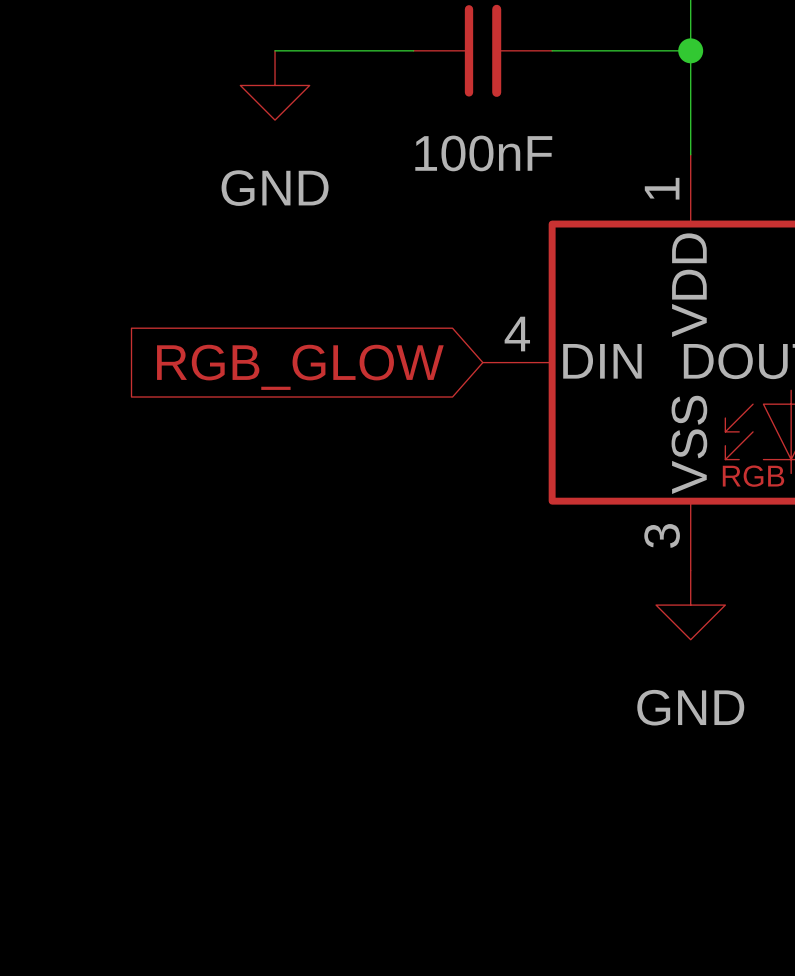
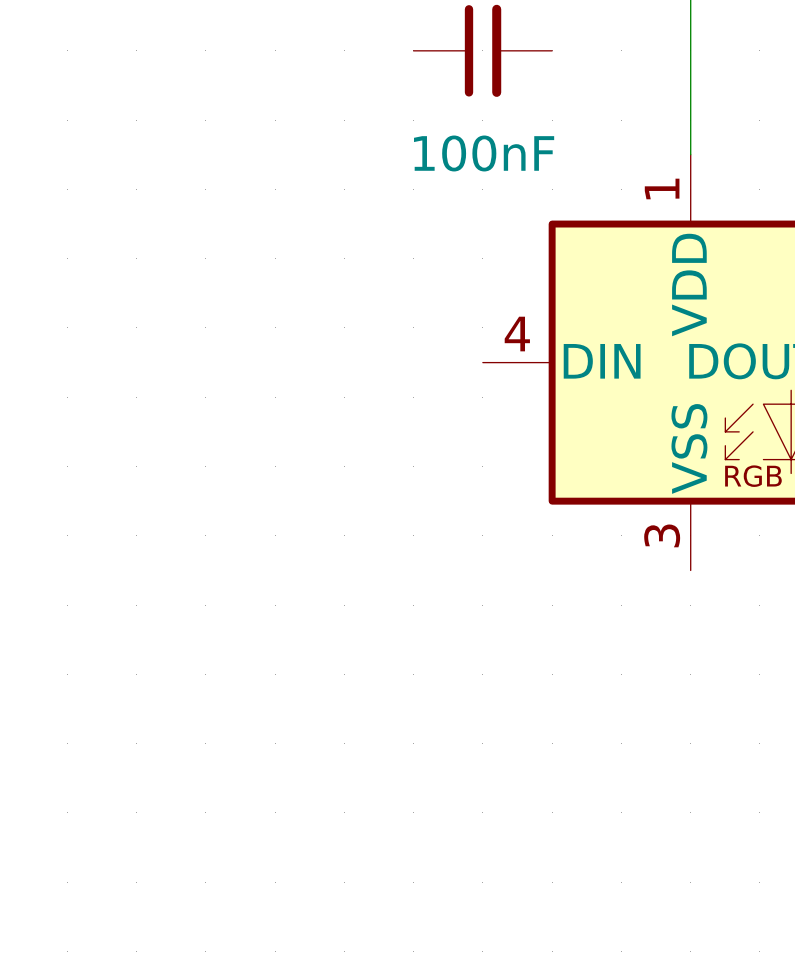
wire: (275, 50) (413, 50) -> none
wire: (552, 50) (690, 50) -> none
junction: (690, 50) -> none
power symbol: GND (275, 85) -> none
global label: RGB_GLOW (300, 367) -> none
power symbol: GND (690, 605) -> none

